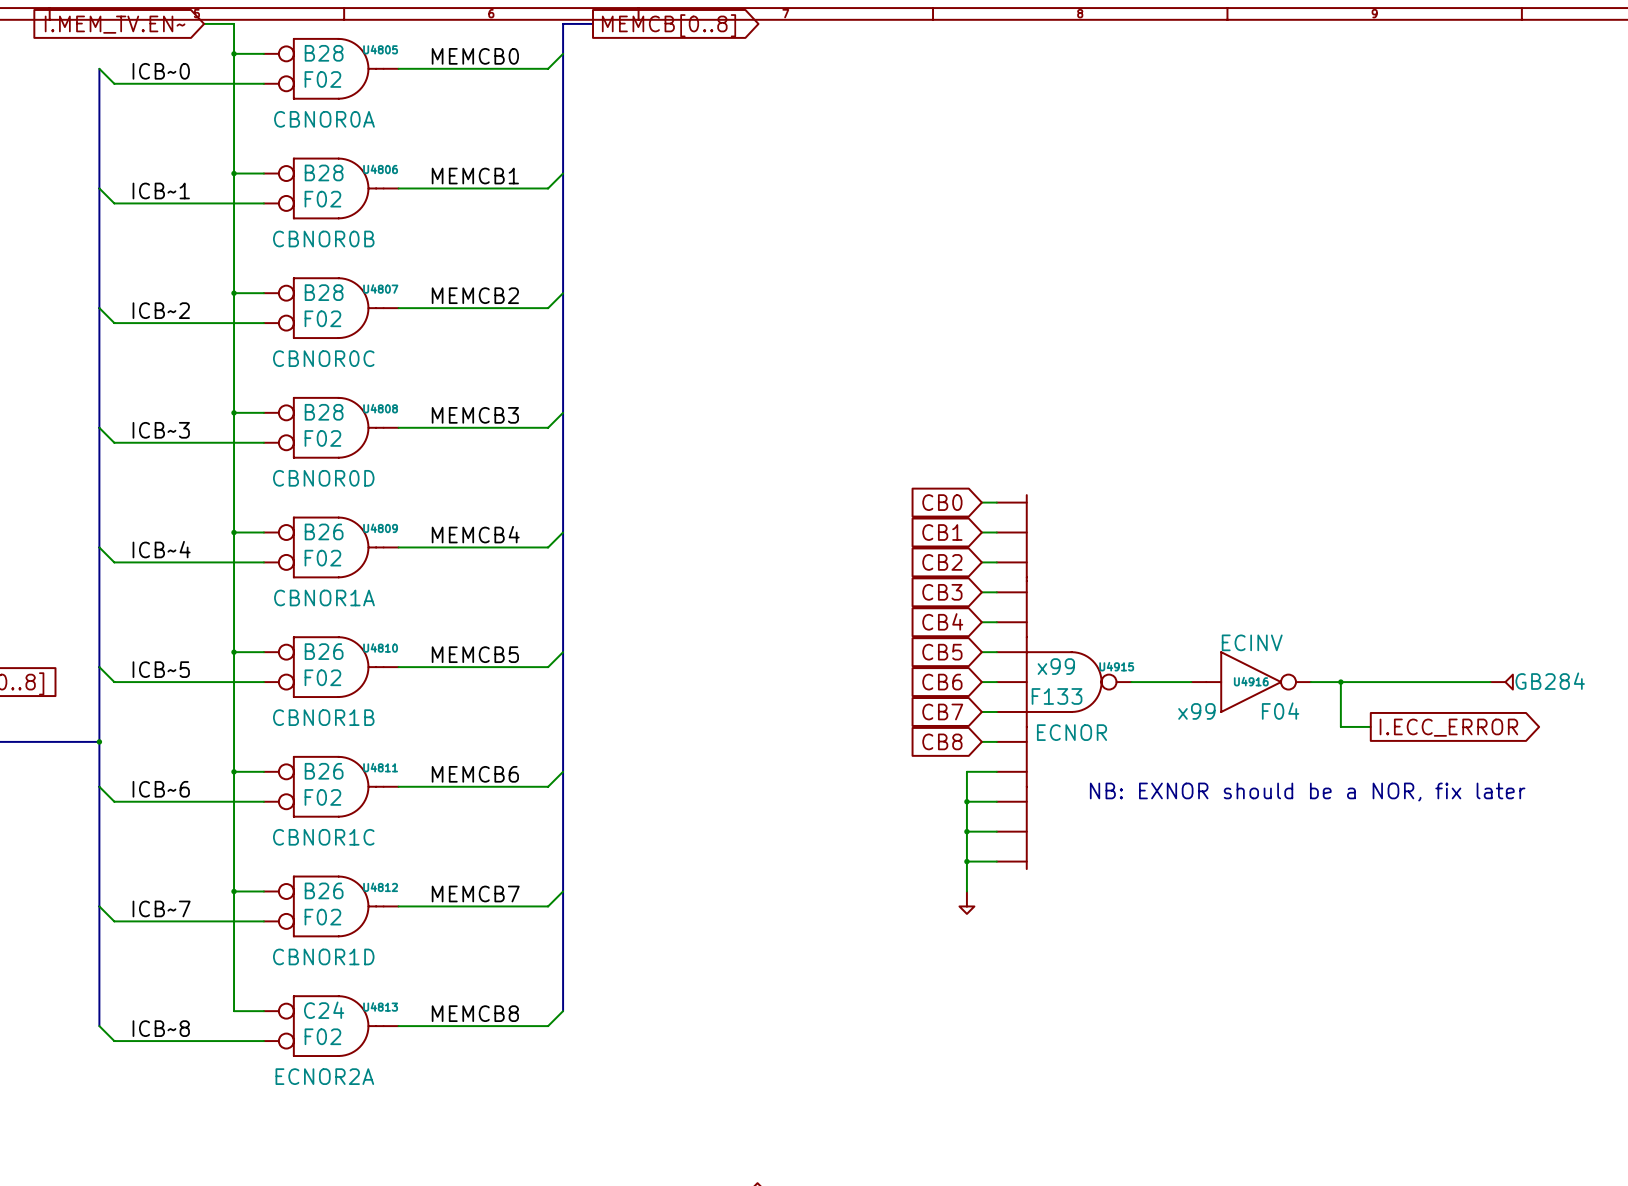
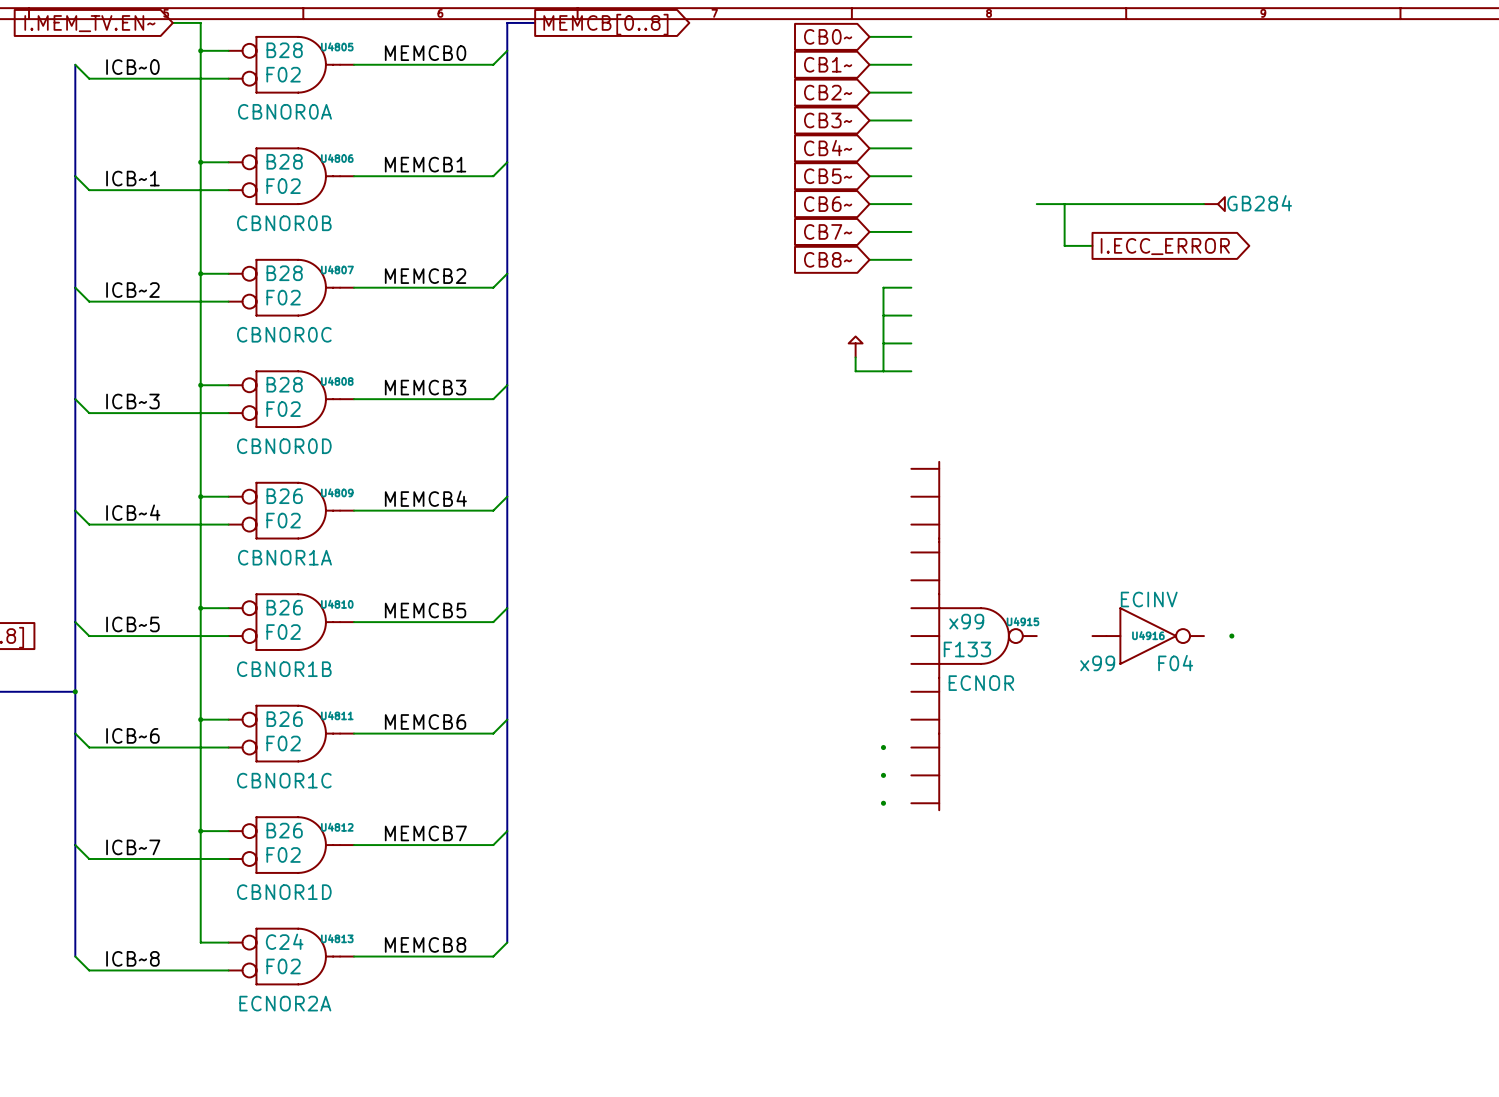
global label: none -> CB0~ (828, 36)
wire: none -> (869, 36) (911, 36)
global label: none -> CB1~ (828, 64)
wire: none -> (869, 64) (911, 64)
global label: none -> CB2~ (828, 92)
wire: none -> (869, 92) (911, 92)
global label: none -> CB3~ (828, 120)
wire: none -> (869, 120) (911, 120)
global label: none -> CB4~ (828, 148)
wire: none -> (869, 148) (911, 148)
global label: none -> CB5~ (828, 176)
wire: none -> (869, 176) (911, 176)
global label: none -> CB6~ (828, 204)
wire: none -> (869, 204) (911, 204)
wire: none -> (1036, 204) (1203, 204)
wire: none -> (1064, 204) (1064, 245) (1092, 245)
global label: none -> CB7~ (828, 231)
wire: none -> (869, 231) (911, 231)
global label: none -> I.ECC_ERROR (1165, 246)
global label: none -> CB8~ (828, 259)
wire: none -> (869, 259) (911, 259)
wire: none -> (911, 287) (883, 287) (883, 371)
wire: none -> (883, 315) (911, 315)
wire: none -> (883, 343) (911, 343)
power symbol: none -> (855, 346)
wire: none -> (855, 357) (855, 371) (911, 371)
global label: CB0 (942, 502) -> none
wire: (981, 502) (996, 502) -> none
global label: CB1 (942, 532) -> none
wire: (981, 532) (996, 532) -> none
global label: CB2 (942, 562) -> none
wire: (981, 562) (996, 562) -> none
global label: CB3 (942, 592) -> none
wire: (981, 592) (996, 592) -> none
global label: CB4 (942, 621) -> none
wire: (981, 622) (996, 622) -> none
global label: CB5 (942, 652) -> none
wire: (981, 652) (996, 652) -> none
global label: CB6 (942, 682) -> none
wire: (981, 682) (996, 682) -> none
wire: (1131, 682) (1191, 682) -> none
wire: (1310, 682) (1490, 682) -> none
wire: (1340, 682) (1340, 726) (1370, 726) -> none
GB284 position: (1501, 682) -> (1214, 204)
global label: CB7 (942, 711) -> none
wire: (981, 711) (996, 711) -> none
global label: I.ECC_ERROR (1448, 727) -> none
global label: CB8 (942, 741) -> none
wire: (981, 741) (996, 741) -> none
wire: (996, 771) (966, 771) (966, 891) -> none
text: NB: EXNOR should be a NOR, fix later (1307, 792) -> none
wire: (966, 801) (996, 801) -> none
wire: (966, 831) (996, 831) -> none
wire: (966, 861) (996, 861) -> none
power symbol: (966, 902) -> none

